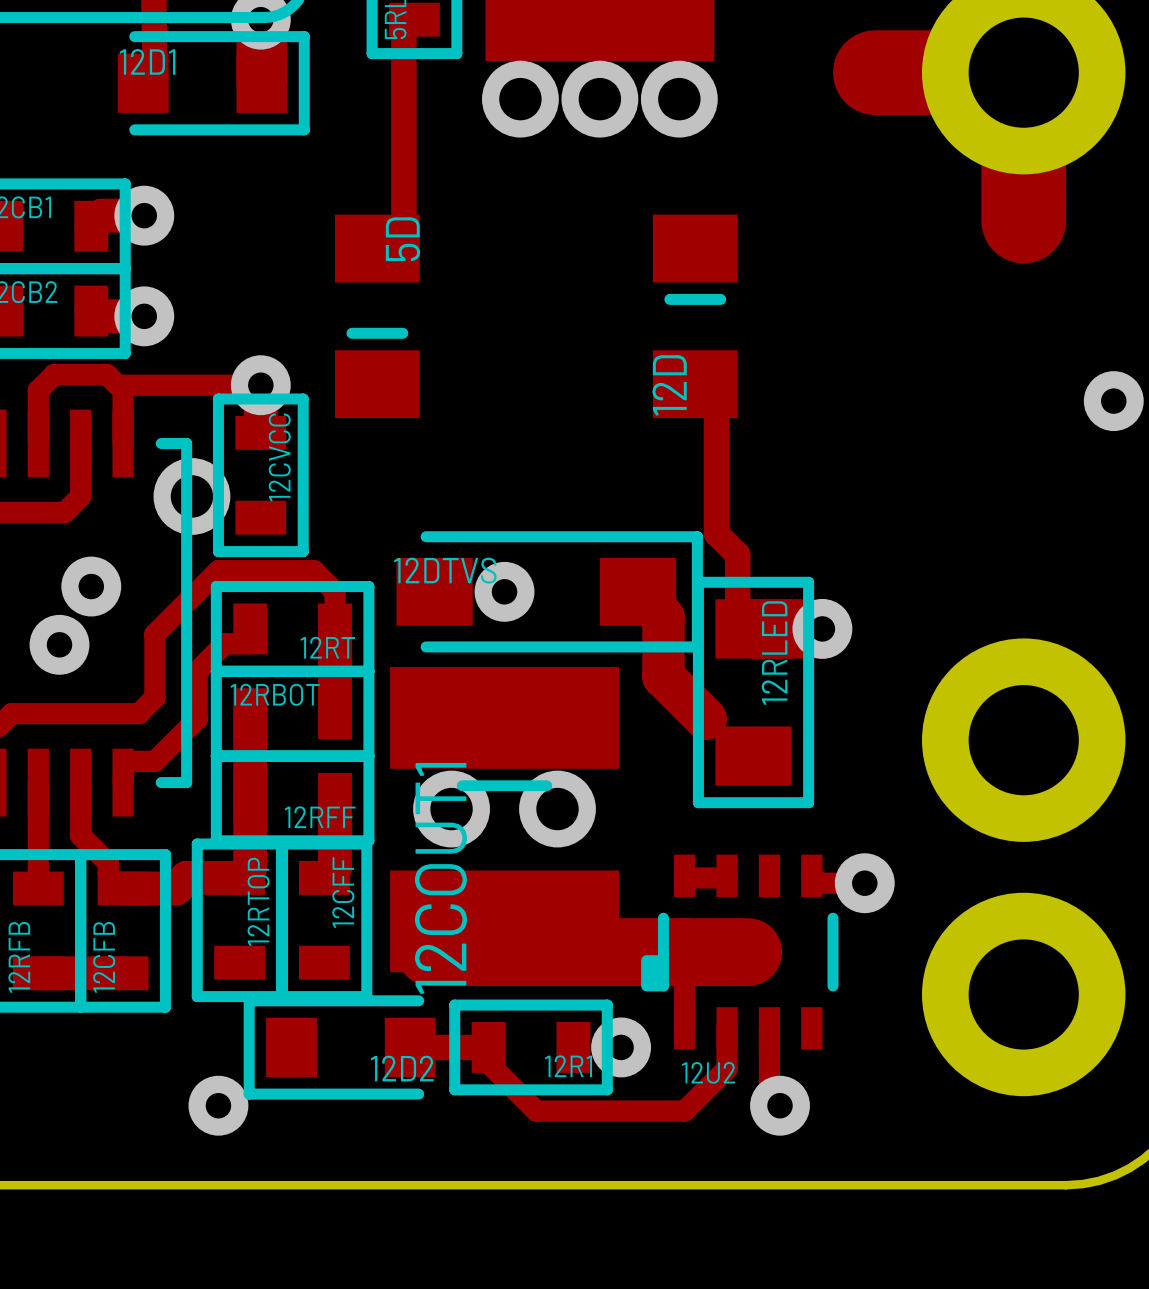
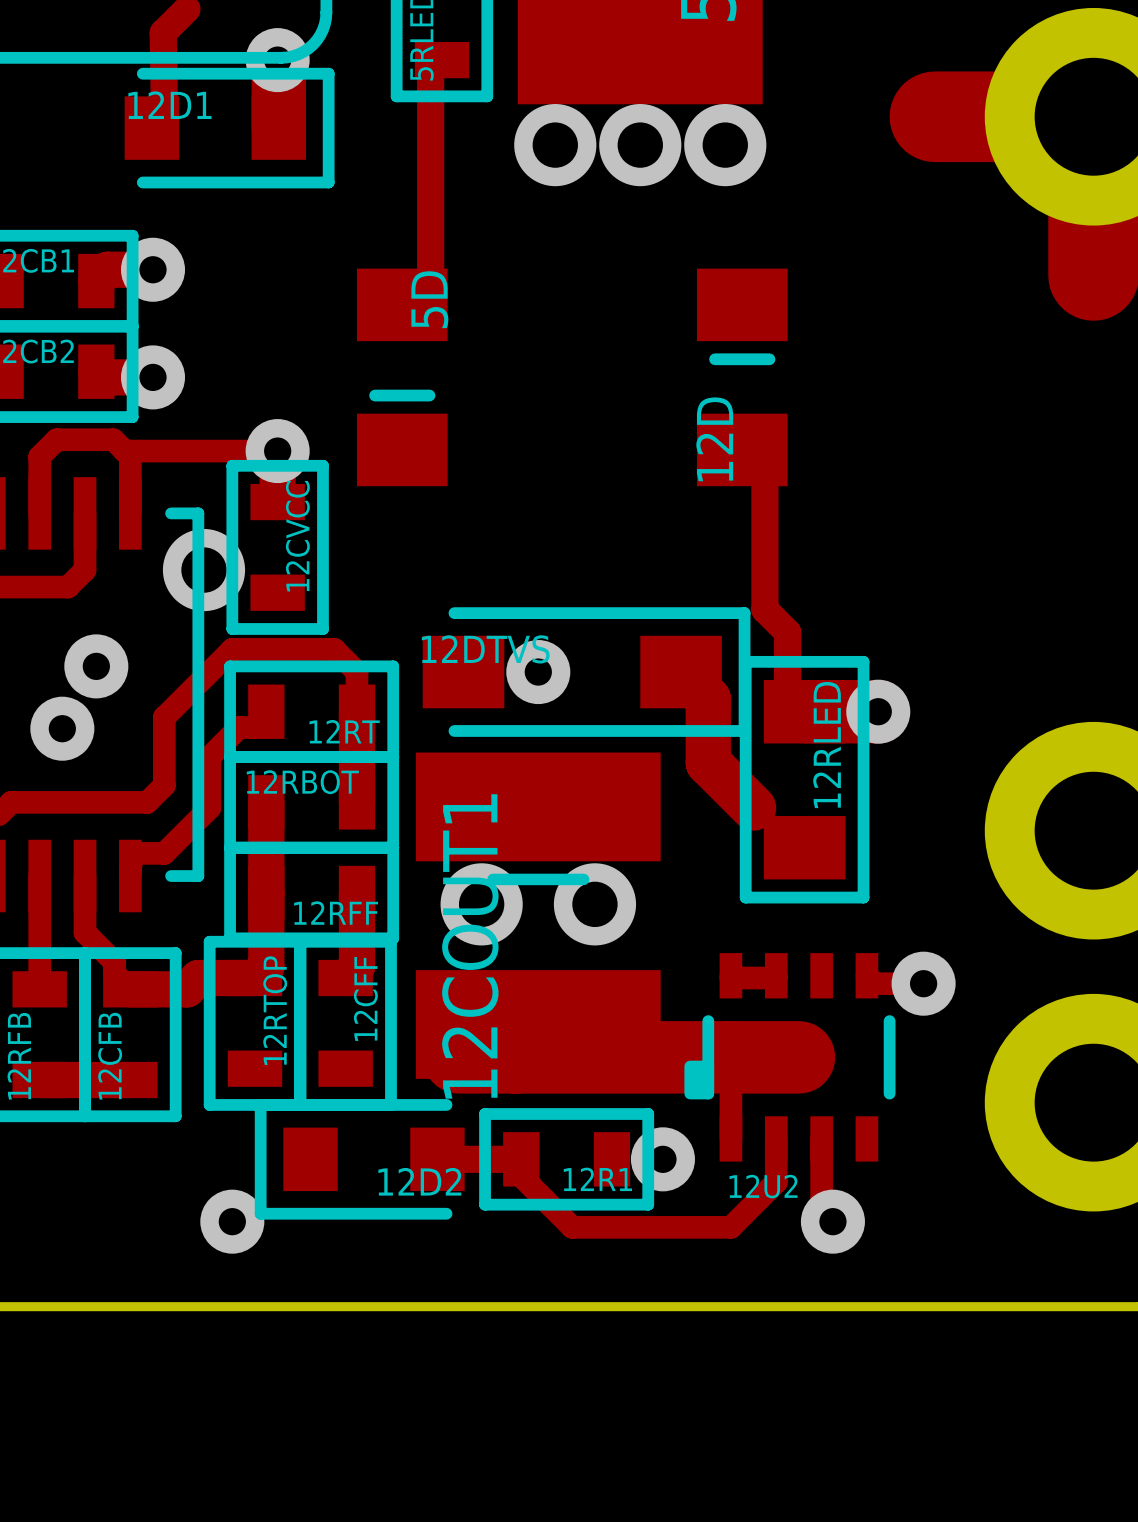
12D1 footprint: [117, 31, 310, 136] -> [124, 67, 335, 189]
12D2 footprint: [243, 995, 436, 1100] -> [254, 1099, 465, 1220]

